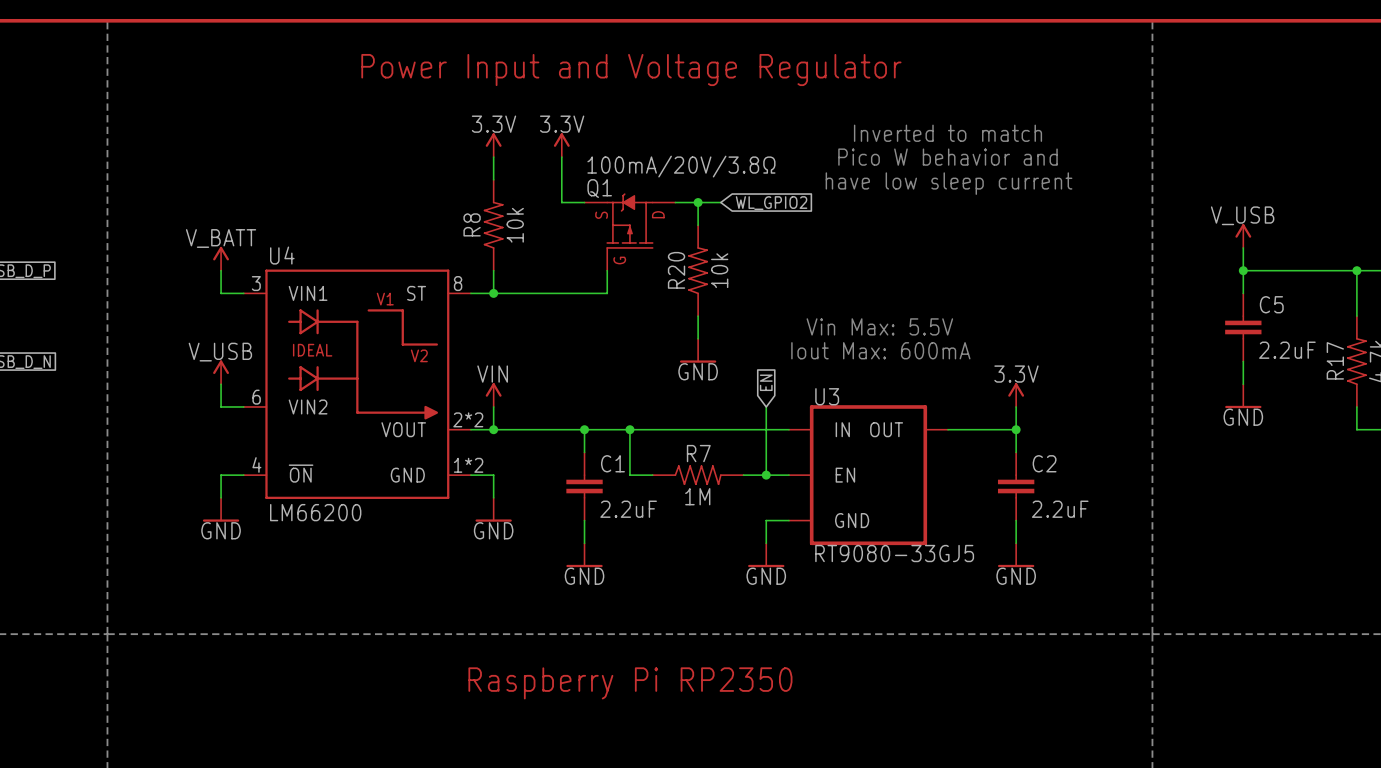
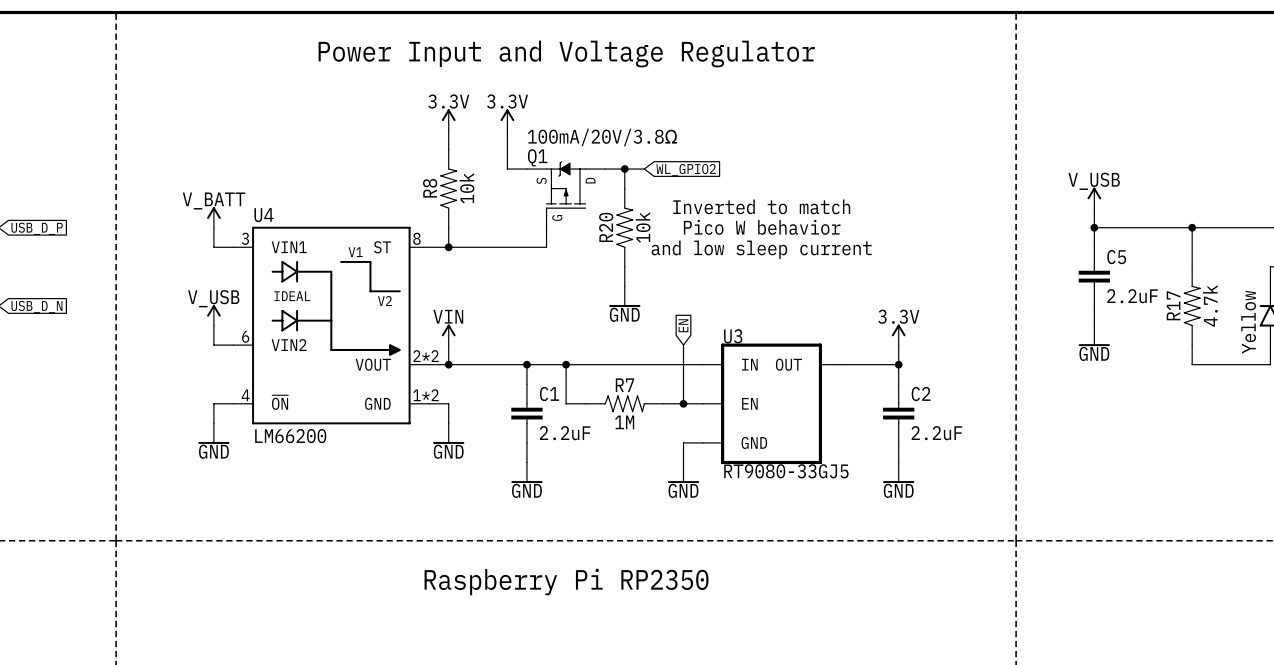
text position: Inverted to match (947, 133) -> Inverted to match (761, 206)
text: Pico W behavior and (947, 157) -> none
text: have low sleep current (949, 183) -> none
text: none -> Pico W behavior (762, 227)
text: none -> and low sleep current (761, 249)
text: Vin Max: 5.5V (879, 326) -> none
text: Iout Max: 600mA (880, 350) -> none

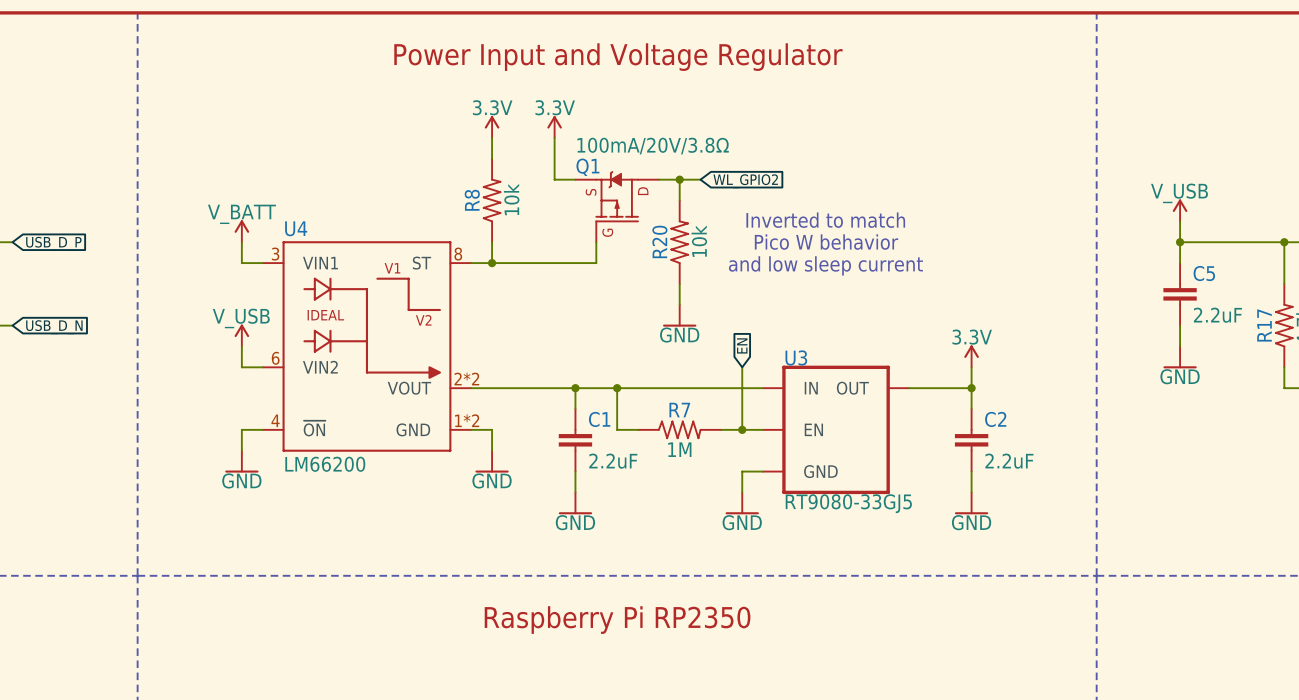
power symbol: VIN (448, 334) -> none
wire: (448, 345) (448, 364) -> none
junction: (448, 364) -> none

